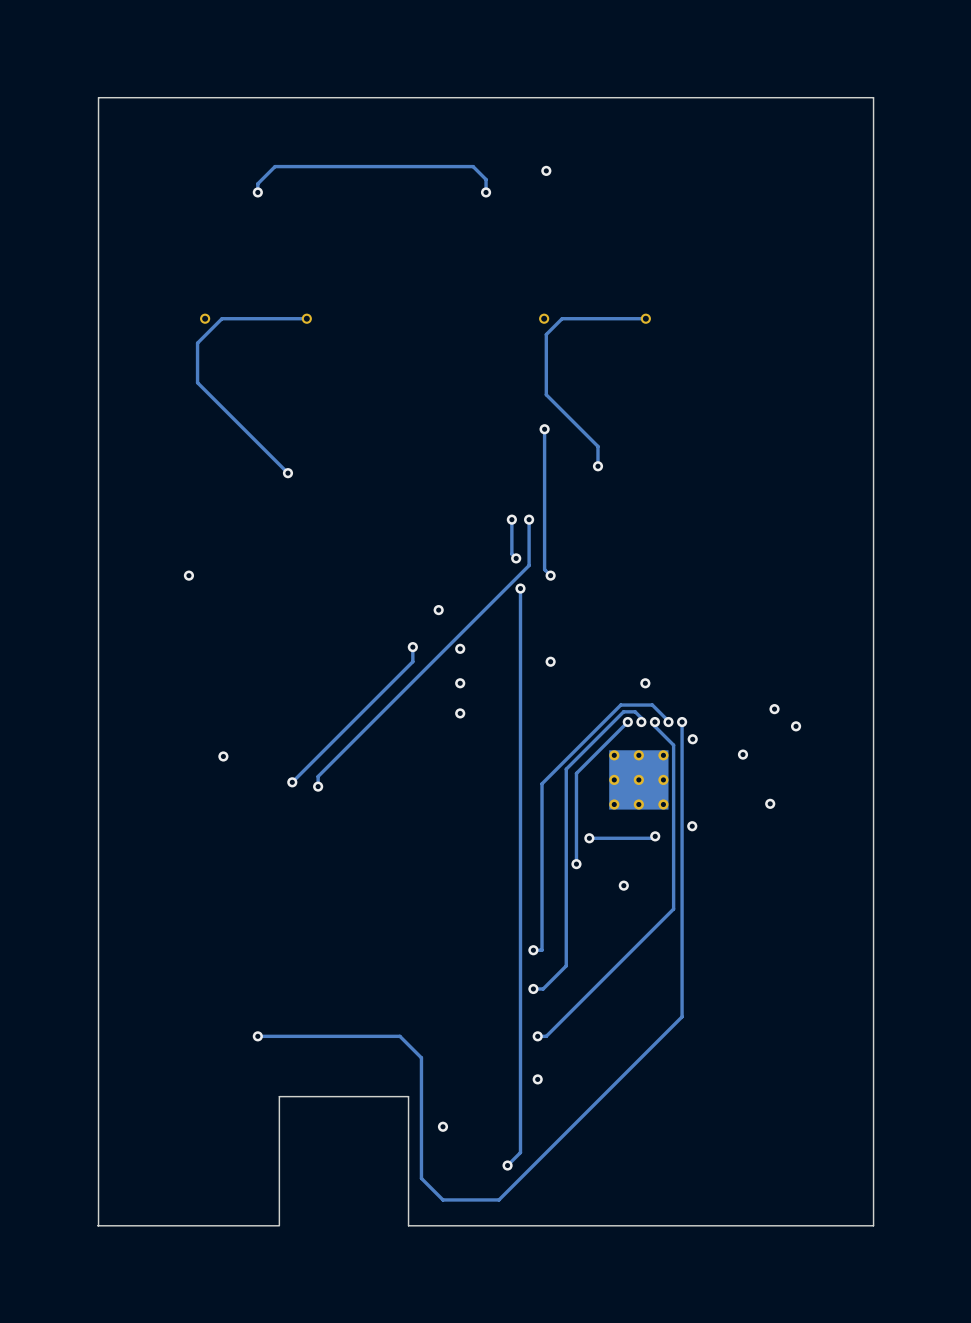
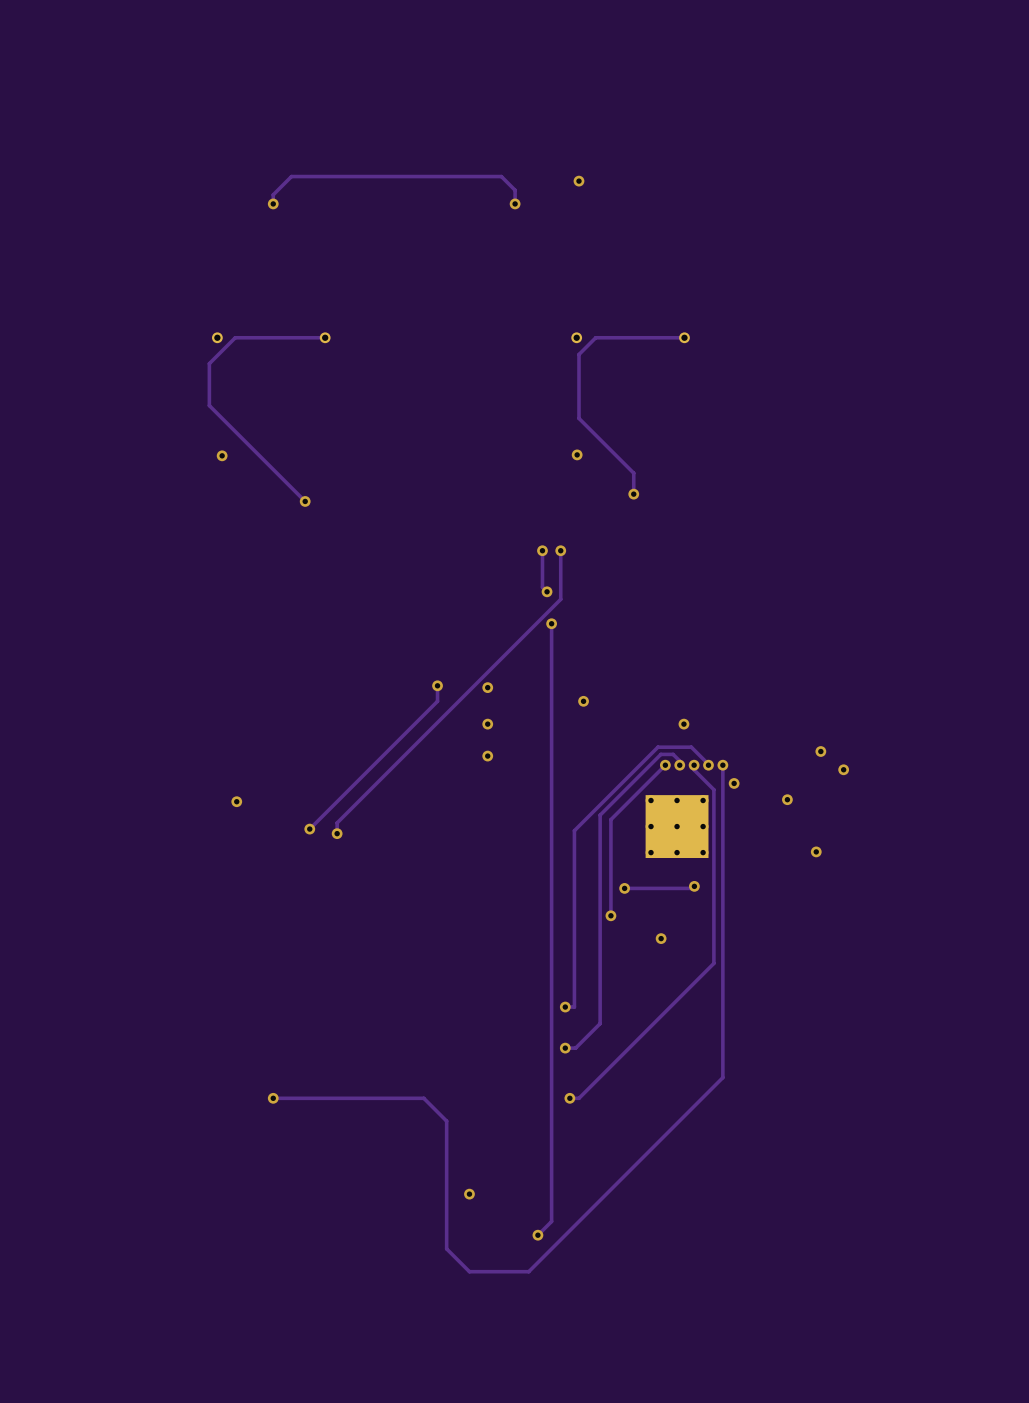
track: (544, 429) (544, 569) (550, 575) -> none
via: none -> (222, 455)
via: (188, 575) -> none
via: (550, 575) -> none
via: (438, 610) -> none
via: (692, 826) -> none
via: (537, 1079) -> none
board edge: (278, 1225) (97, 1225) -> none
board edge: (279, 1225) (279, 1096) (408, 1096) (408, 1225) (873, 1225) (873, 97) (98, 97) (98, 1225) -> none

